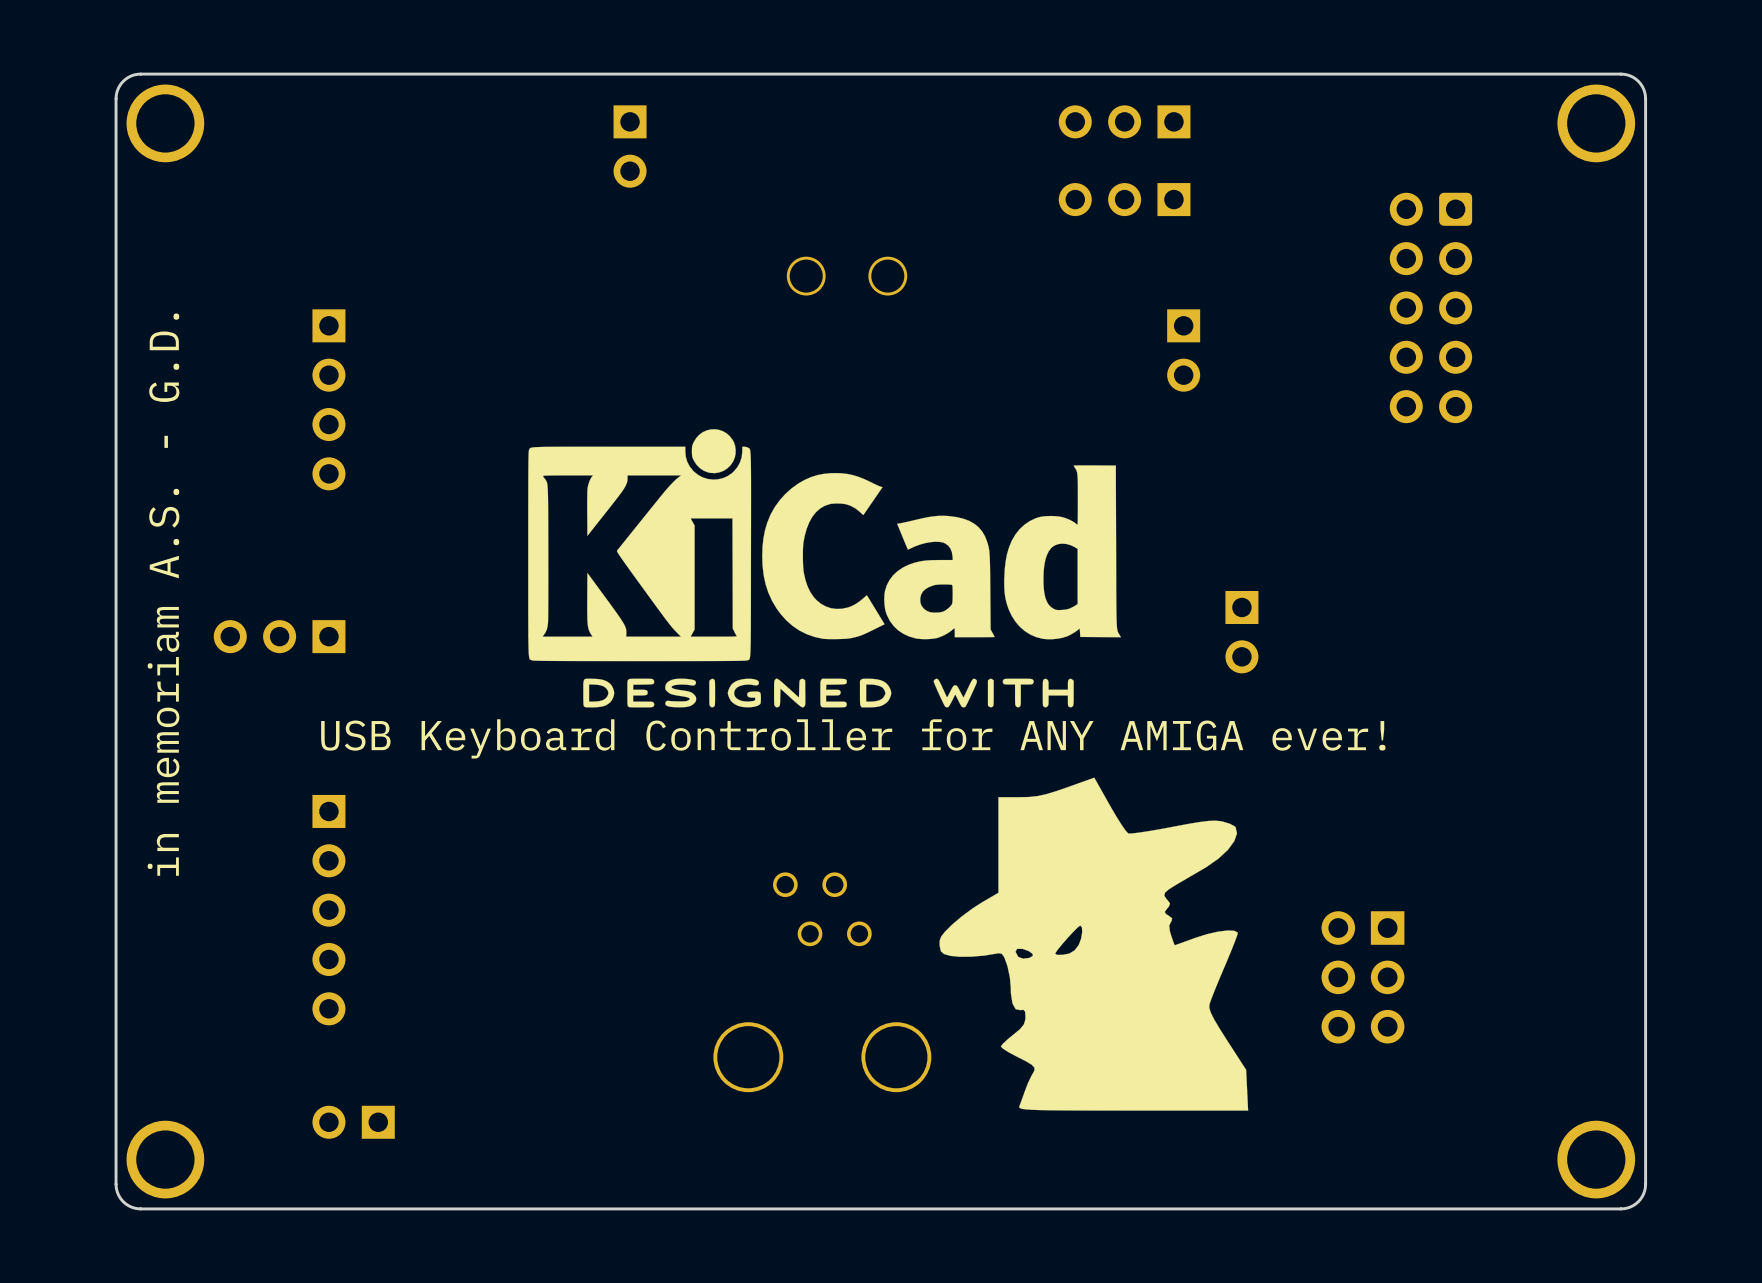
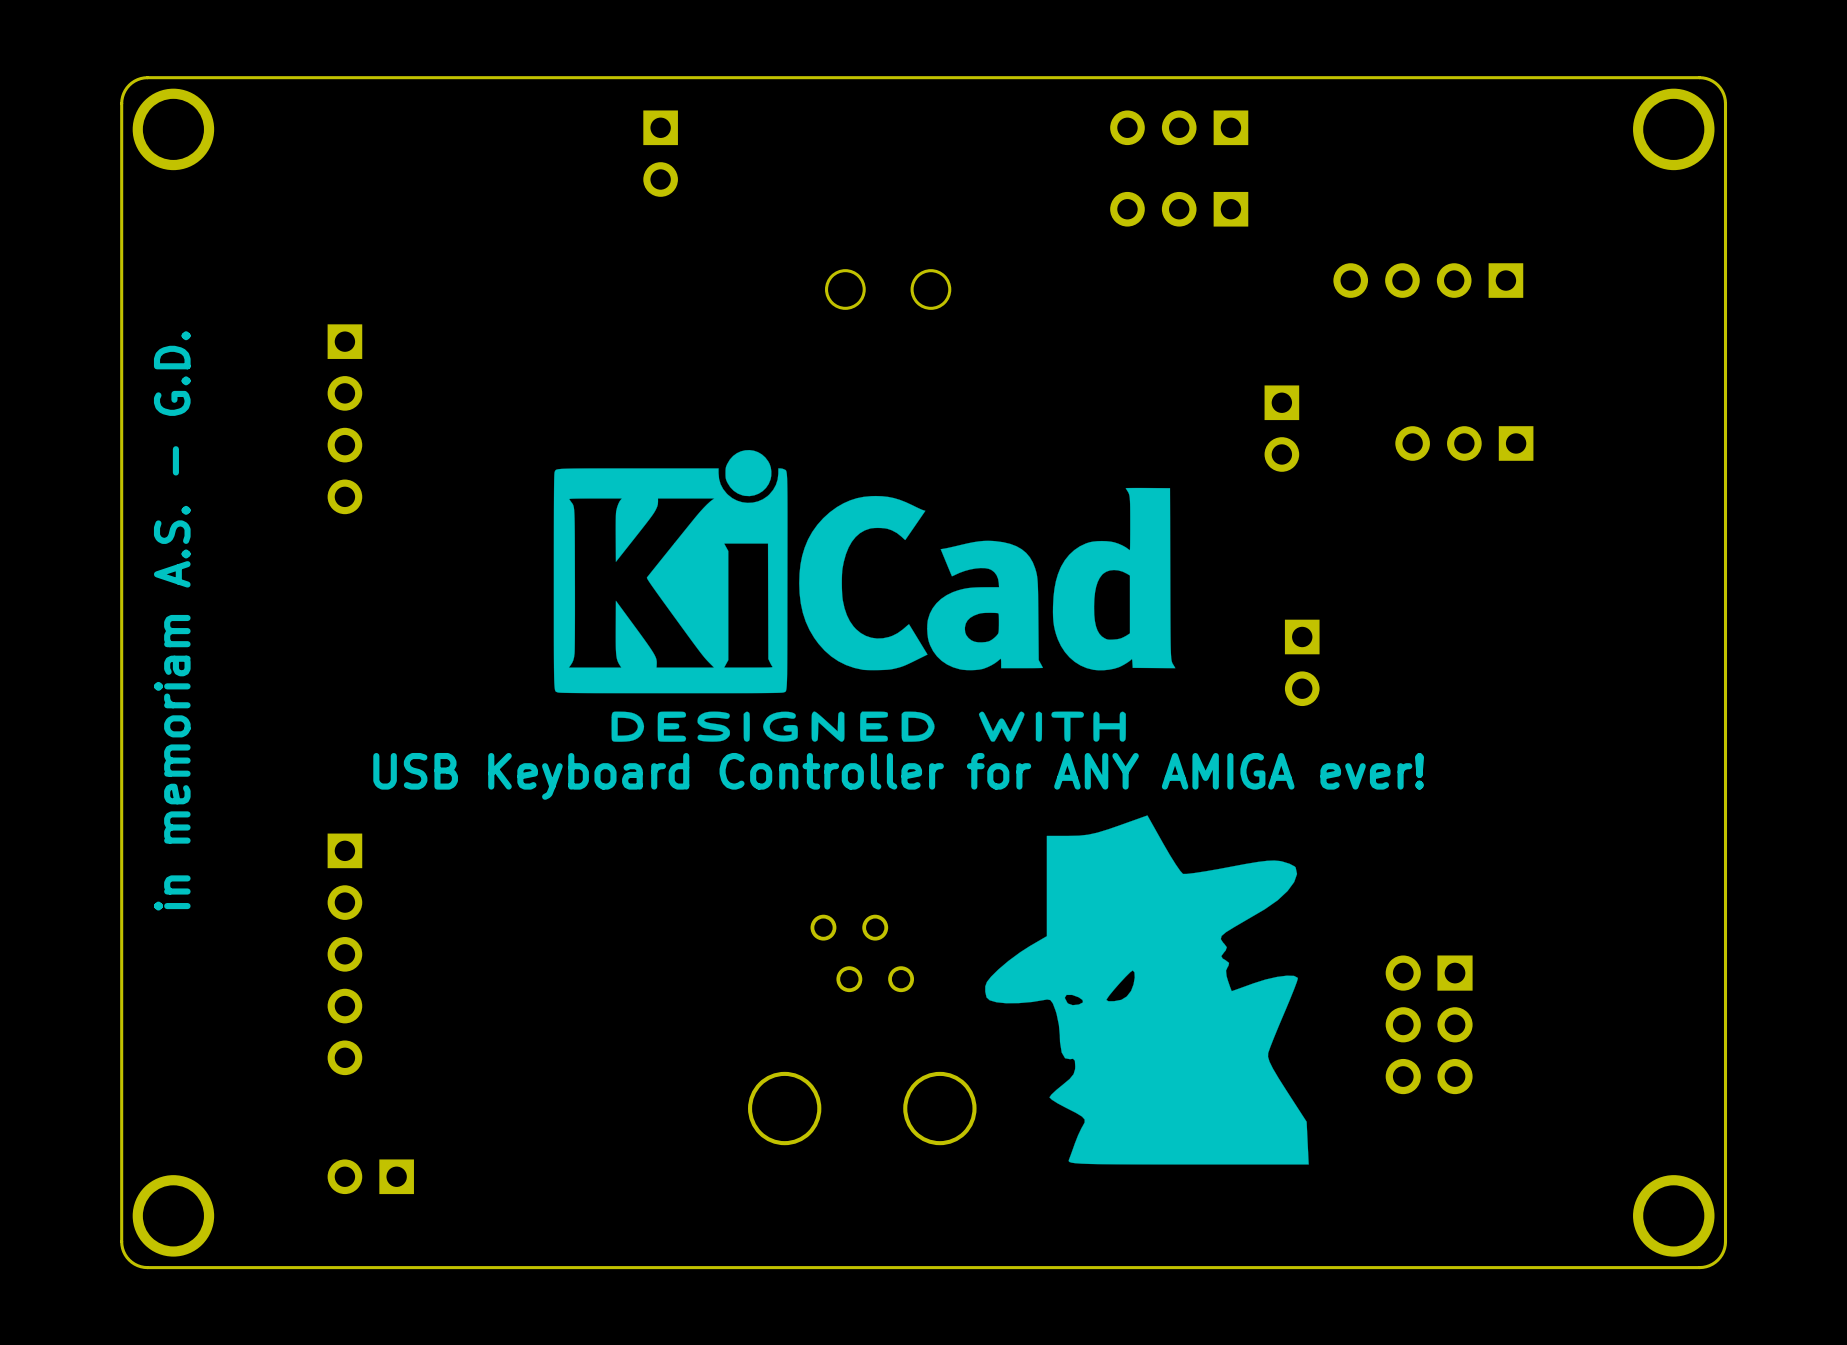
part: none -> (1428, 280)
part: (1430, 307) -> none
part position: (1183, 350) -> (1281, 428)
part: none -> (1464, 443)
part: (279, 636) -> none

